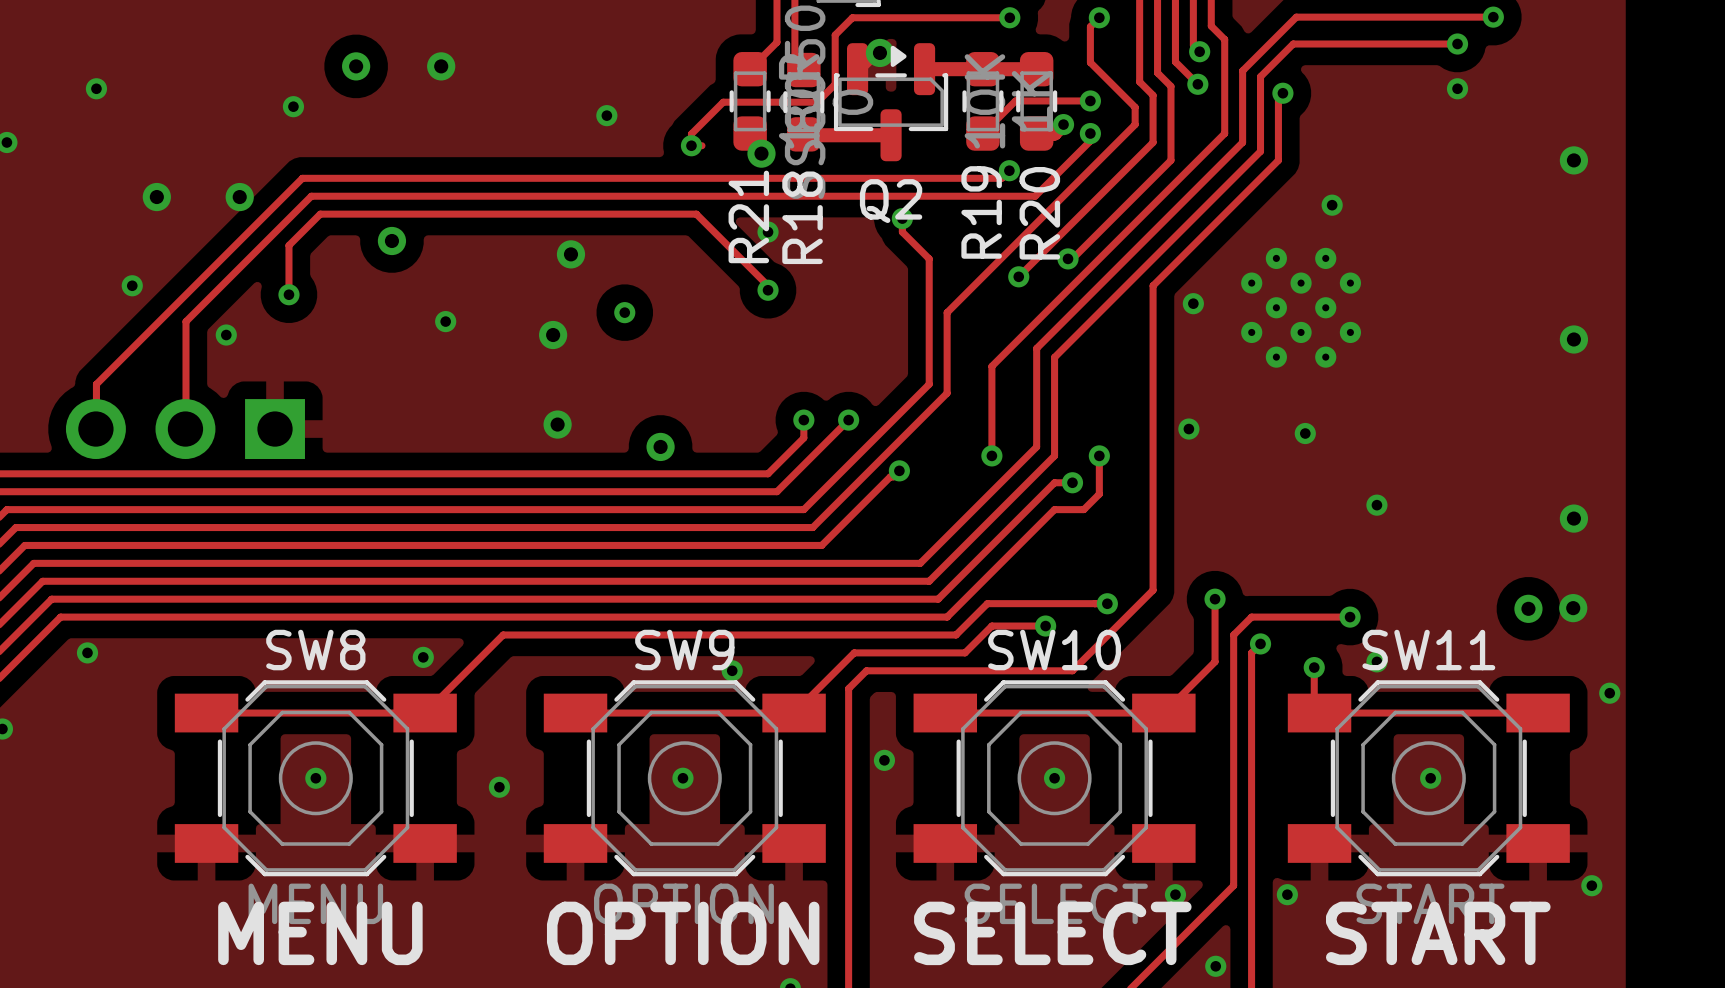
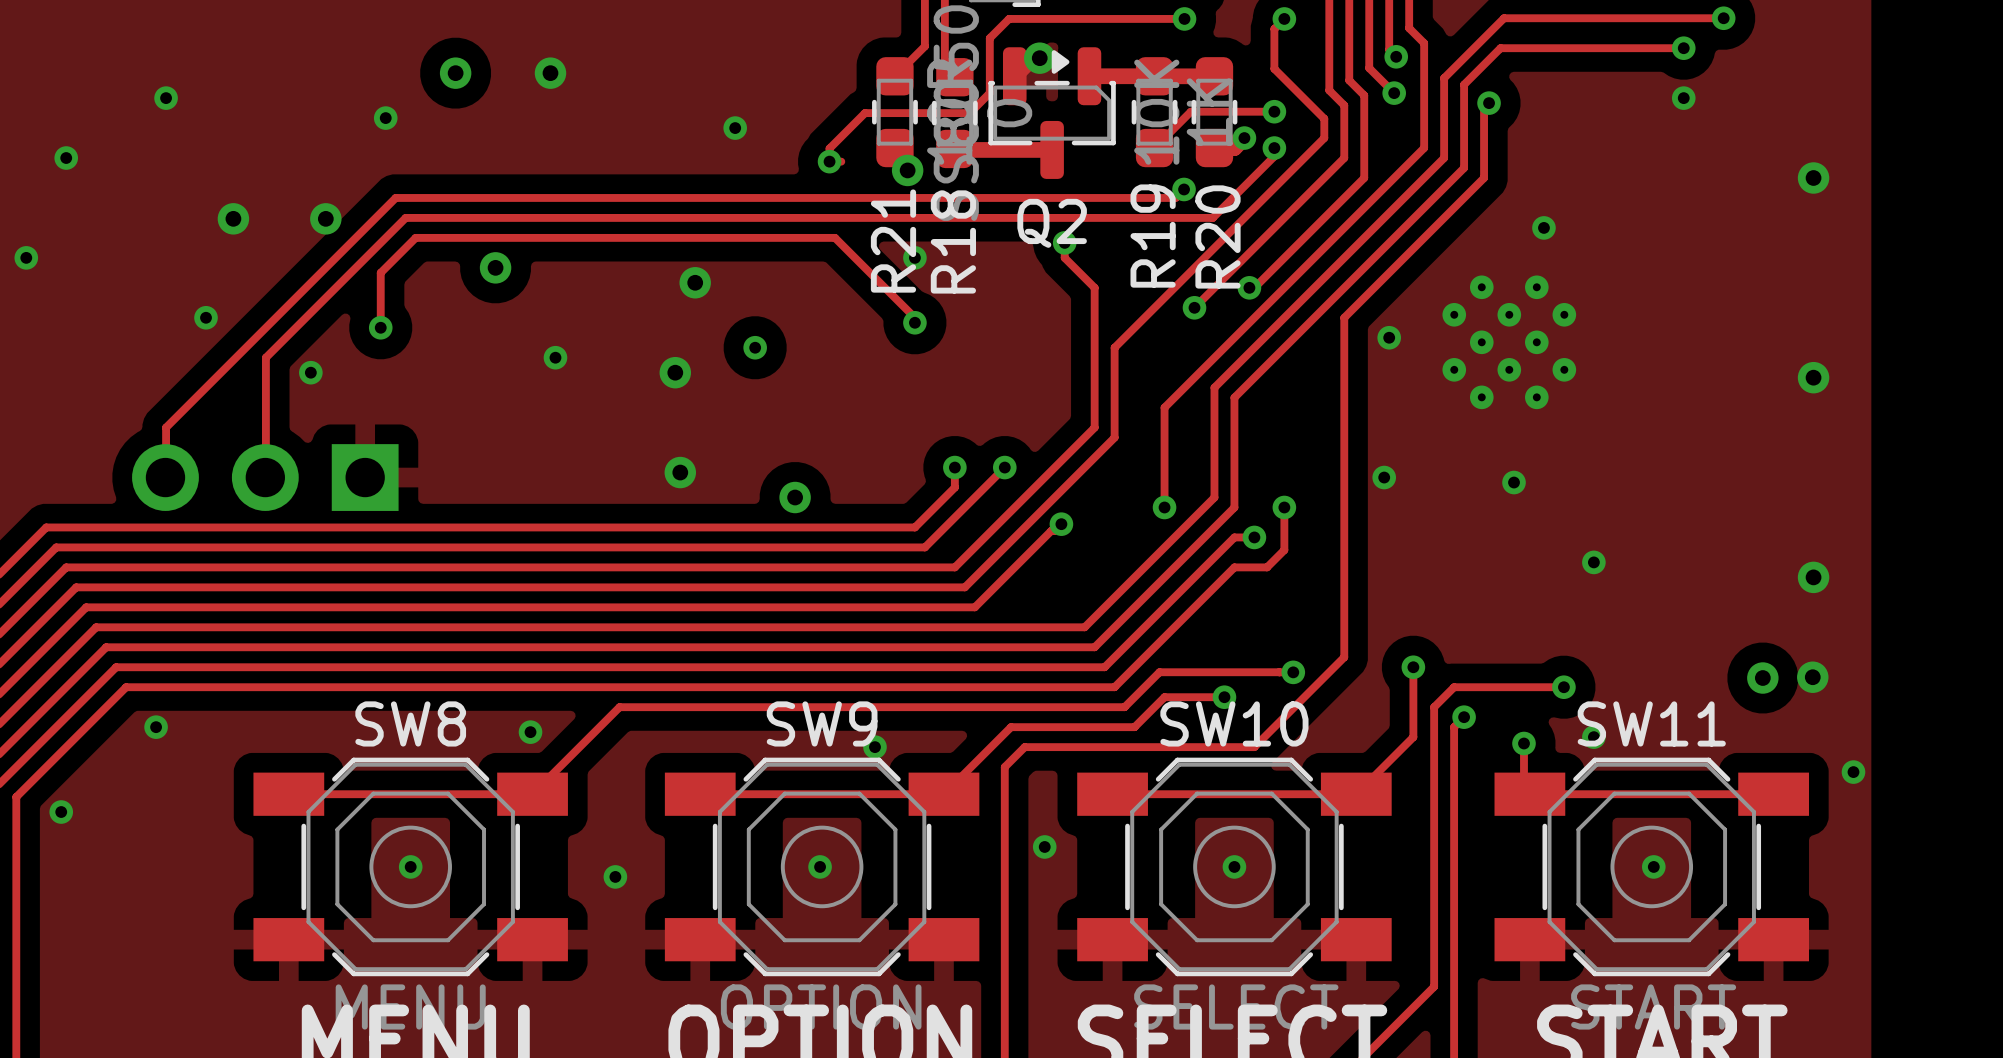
via: (1591, 885) -> none
via: (1175, 894) -> none
via: (1287, 894) -> none

